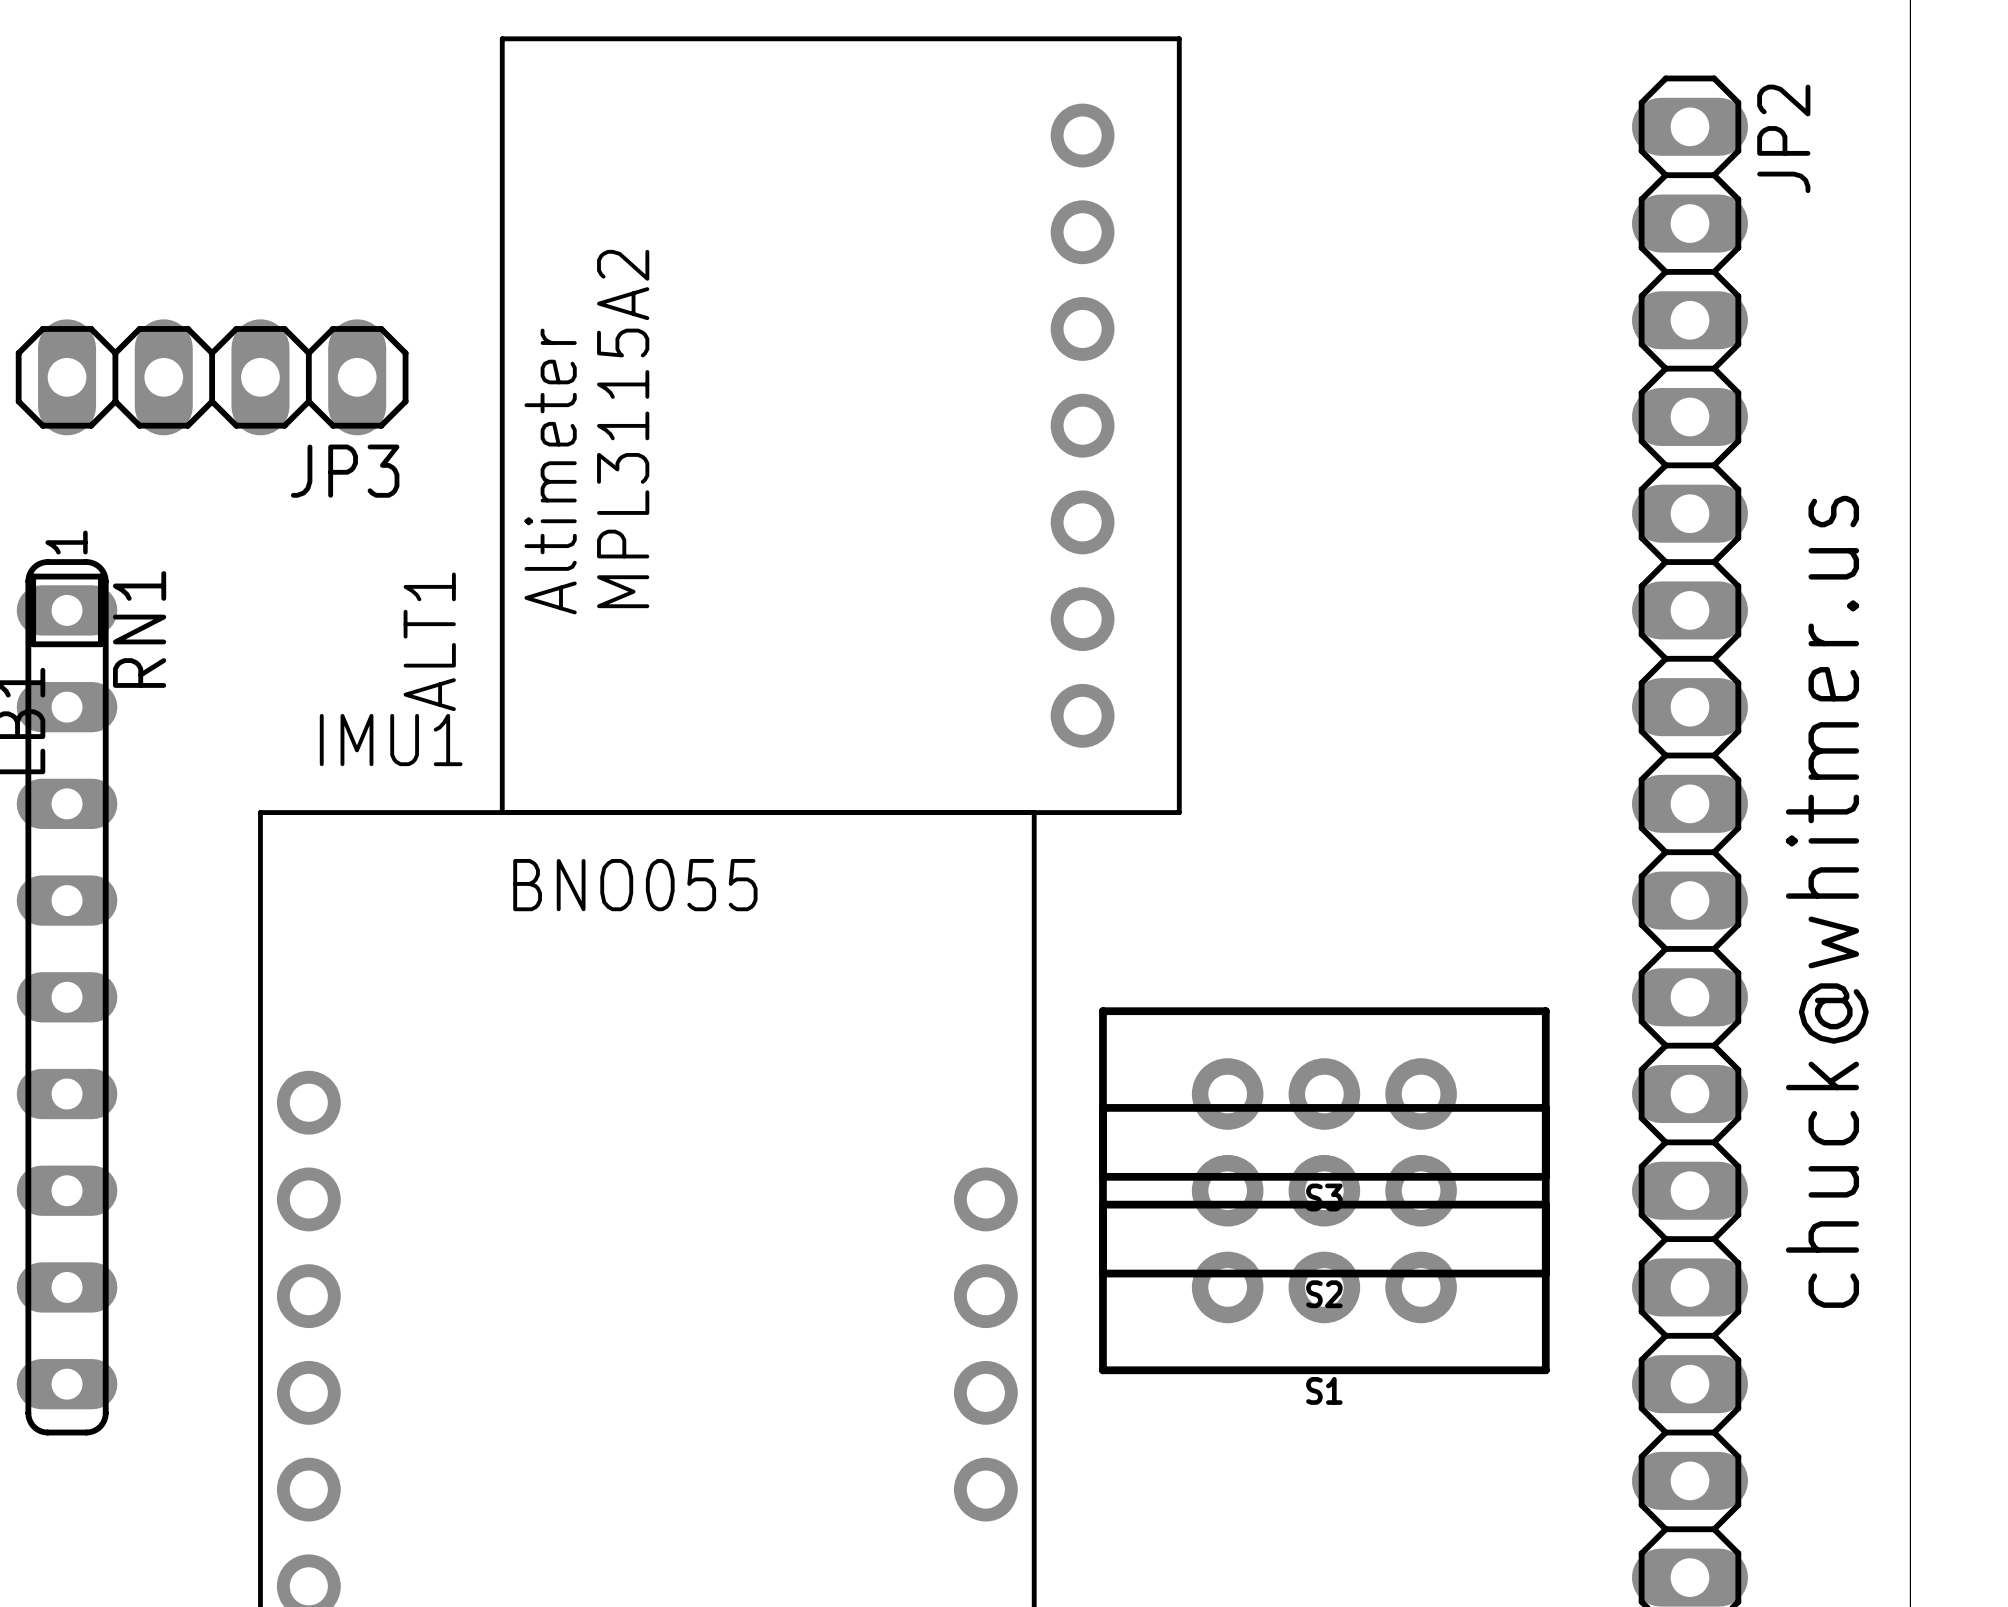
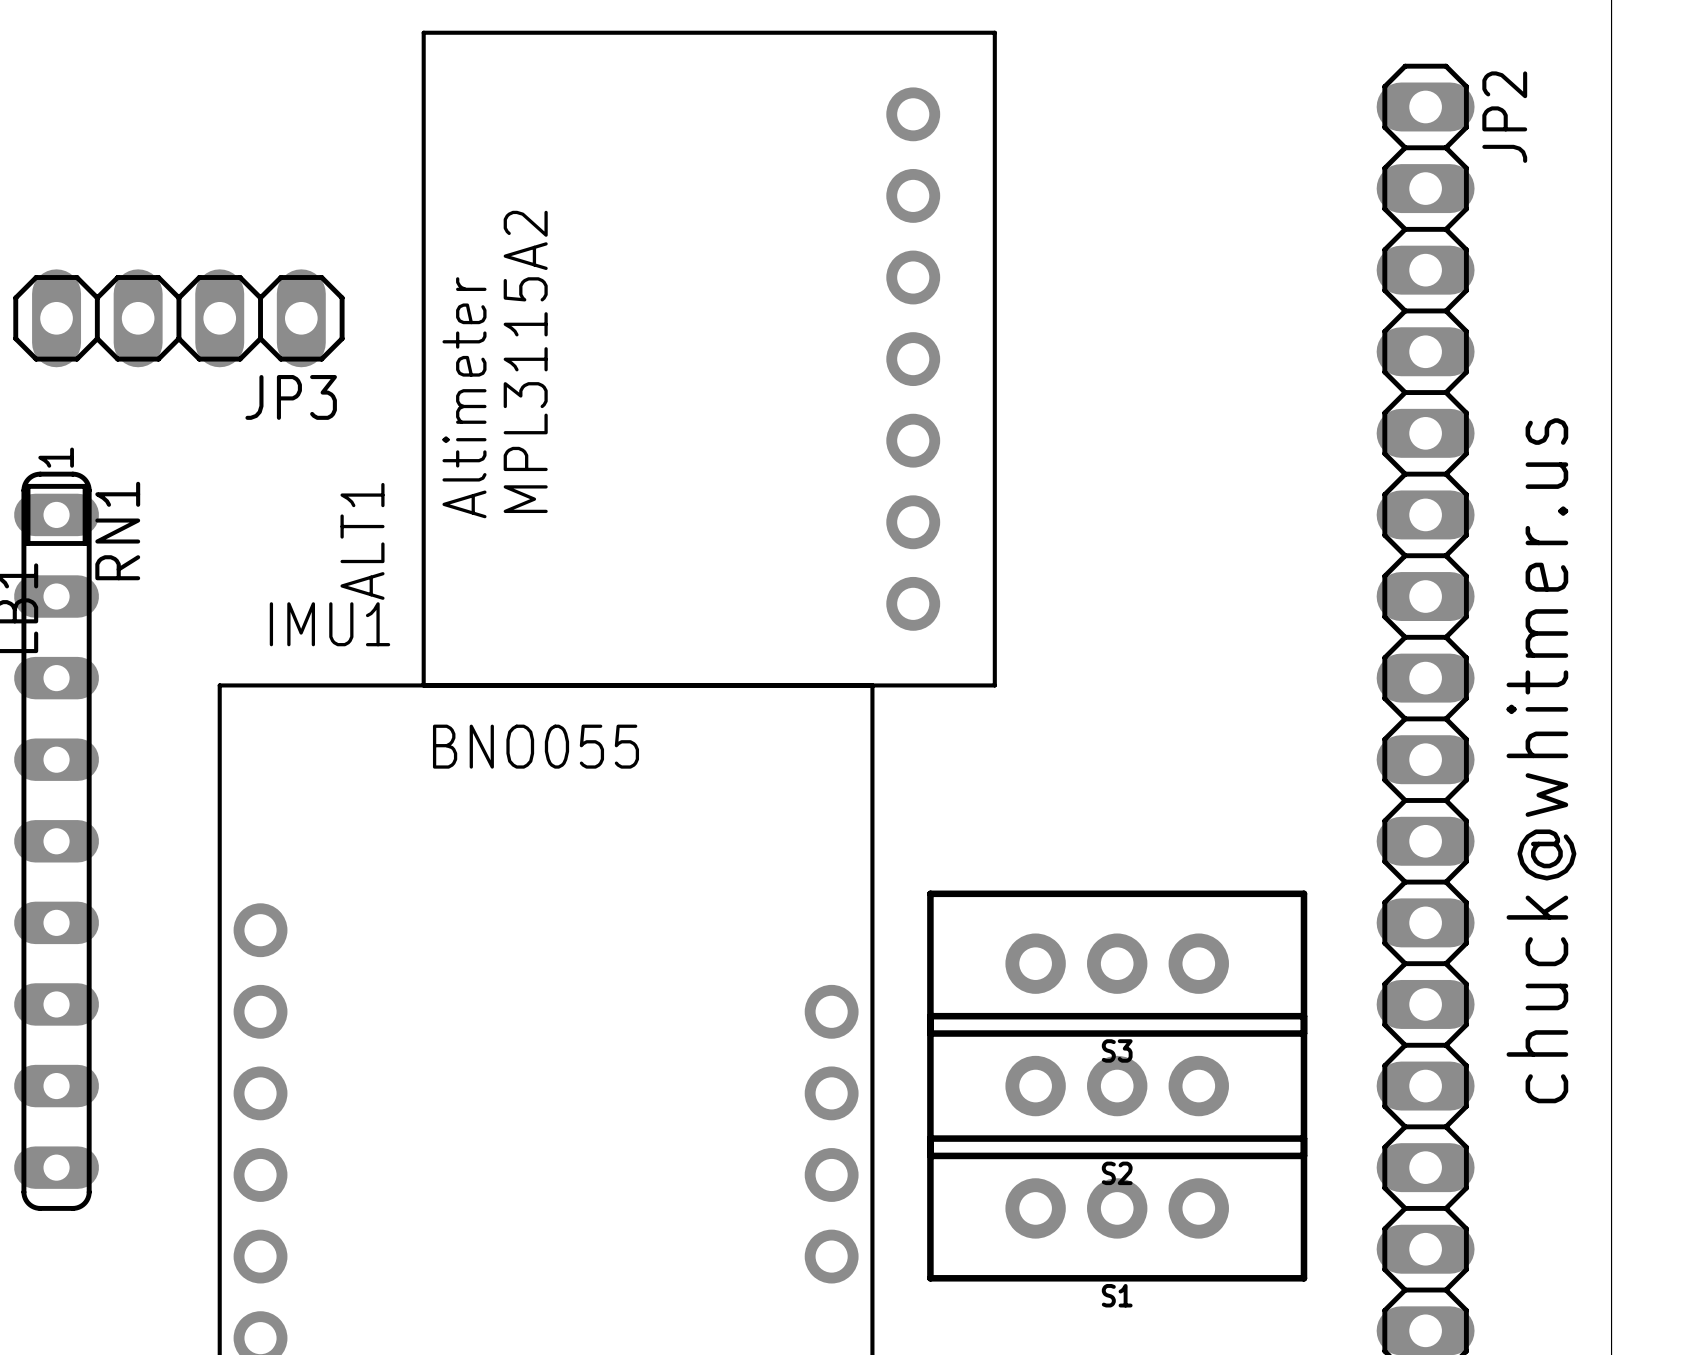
S3 position: (1324, 1094) -> (1117, 963)
S2: (1324, 1190) -> none
S1 name: S1 (1324, 1390) -> S2 (1117, 1173)
S1: none -> (1117, 1208)

